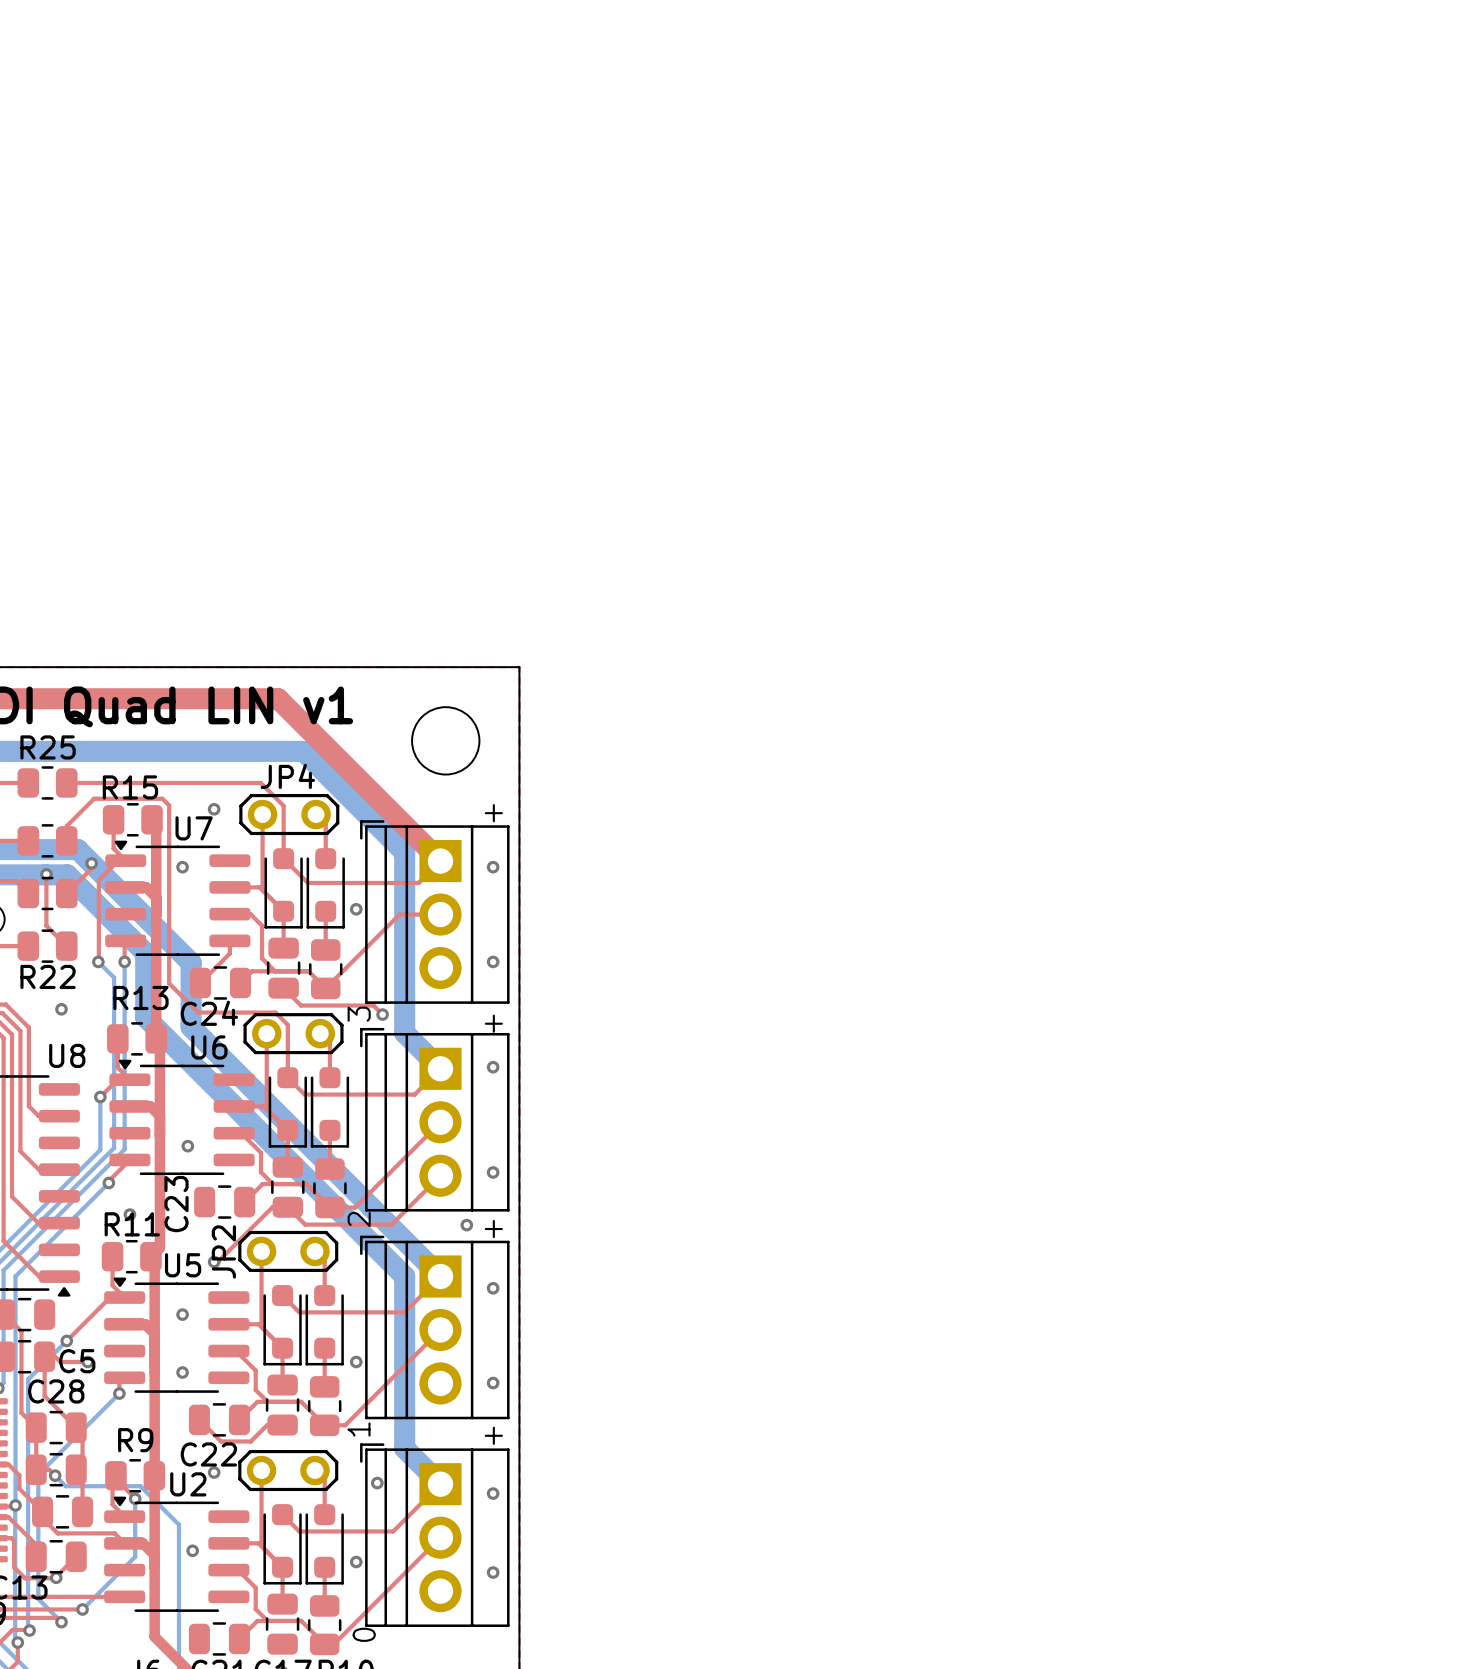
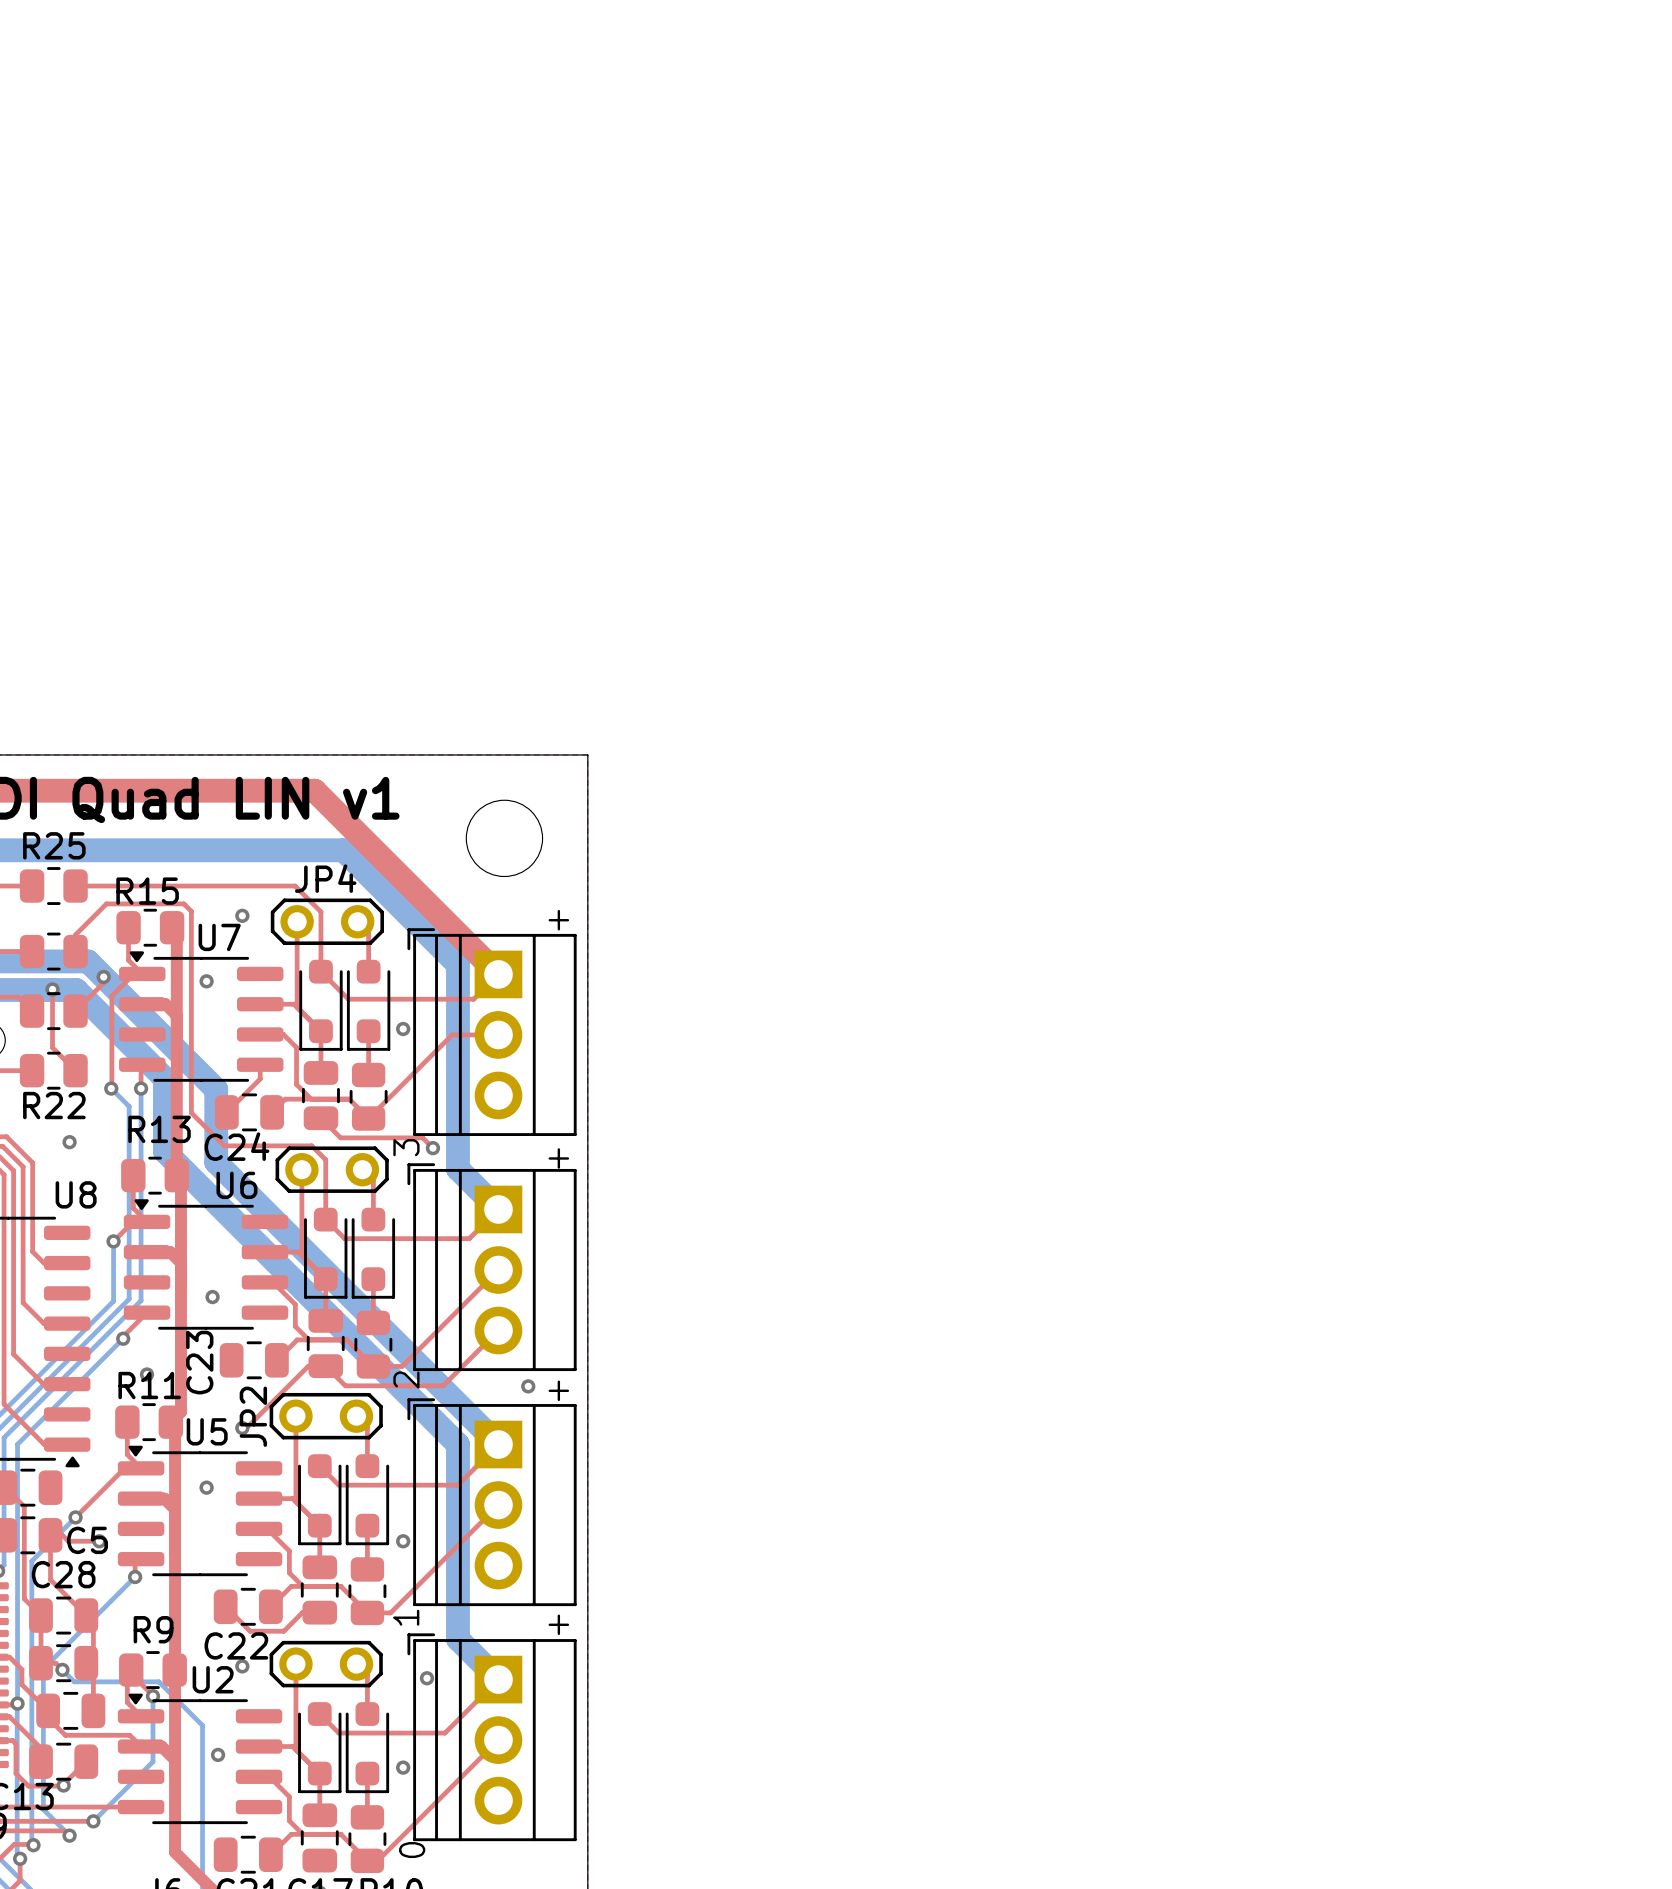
via: (493, 867) -> none
via: (493, 961) -> none
via: (493, 1067) -> none
via: (493, 1172) -> none
via: (493, 1288) -> none
via: (182, 1372) -> none
via: (493, 1383) -> none
via: (493, 1493) -> none
via: (493, 1572) -> none

